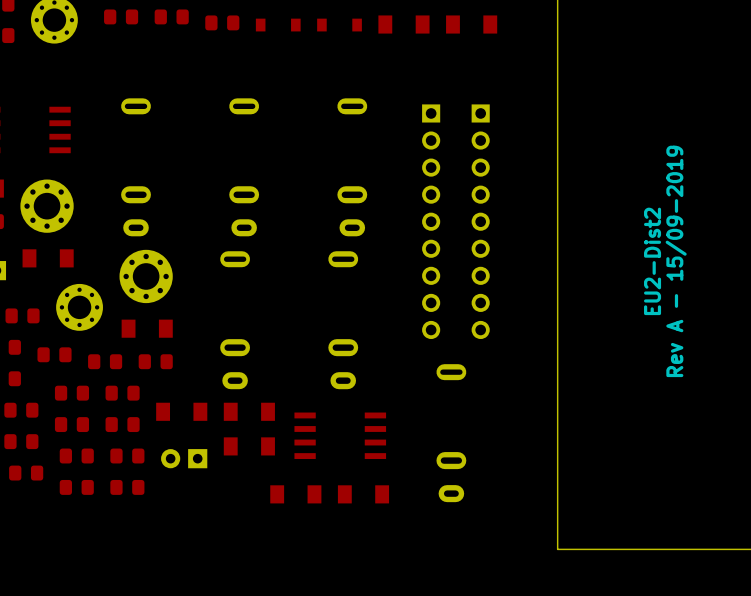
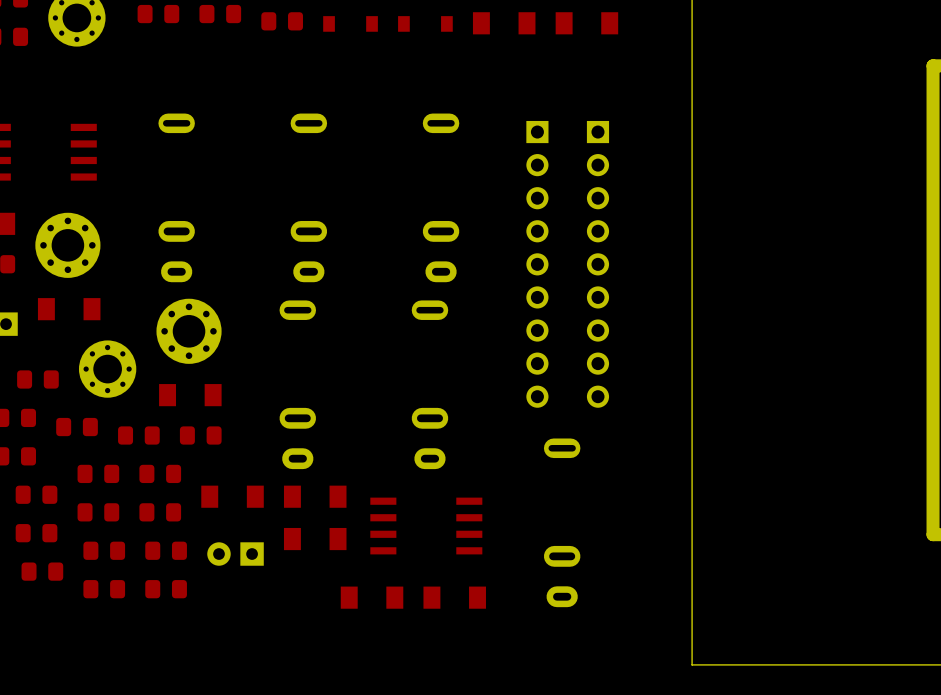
text: EU2-Dist2 (652, 261) -> none
text: Rev A - 15/09-2019 (676, 261) -> none

